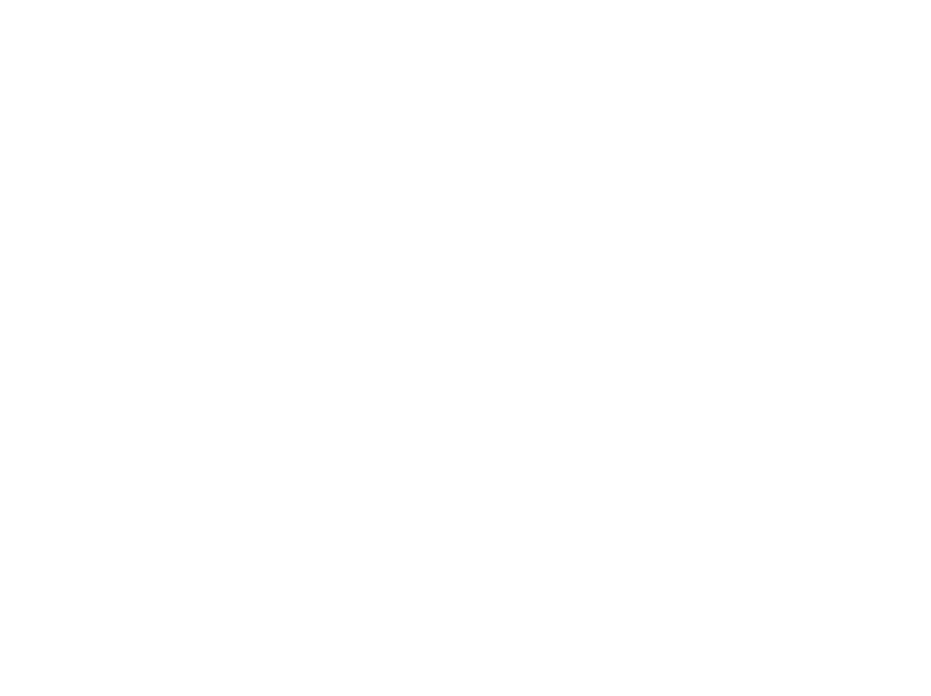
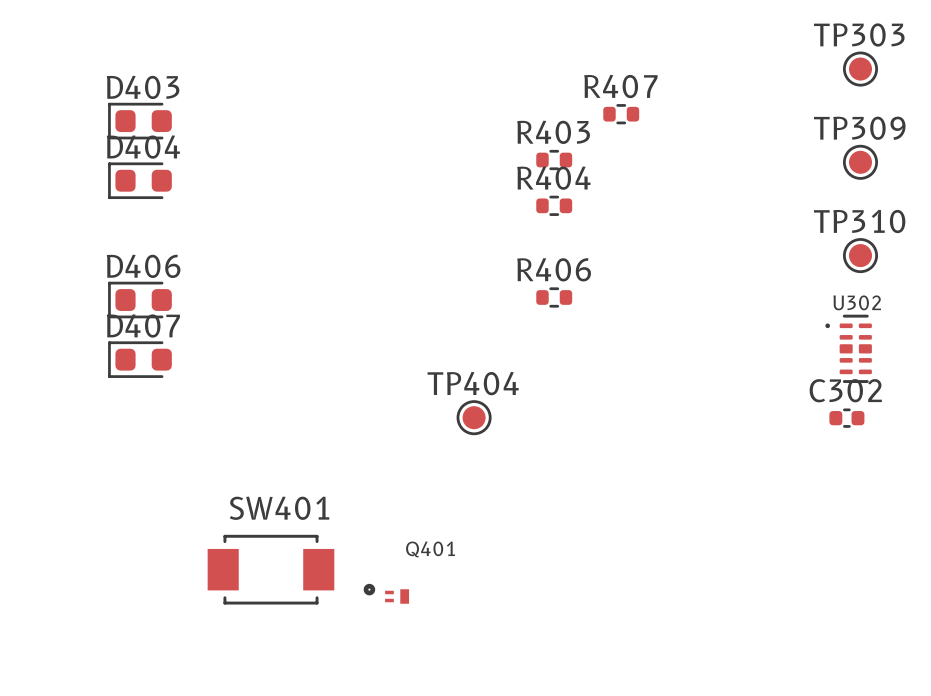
TP303: none -> (860, 69)
R407: none -> (621, 114)
D403: none -> (139, 121)
R403: none -> (554, 160)
TP309: none -> (860, 162)
D404: none -> (139, 180)
R404: none -> (554, 205)
TP310: none -> (860, 255)
R406: none -> (554, 297)
D406: none -> (139, 300)
U302: none -> (848, 348)
D407: none -> (139, 359)
TP404: none -> (474, 417)
C302: none -> (846, 418)
SW401: none -> (270, 569)
Q401: none -> (386, 593)

